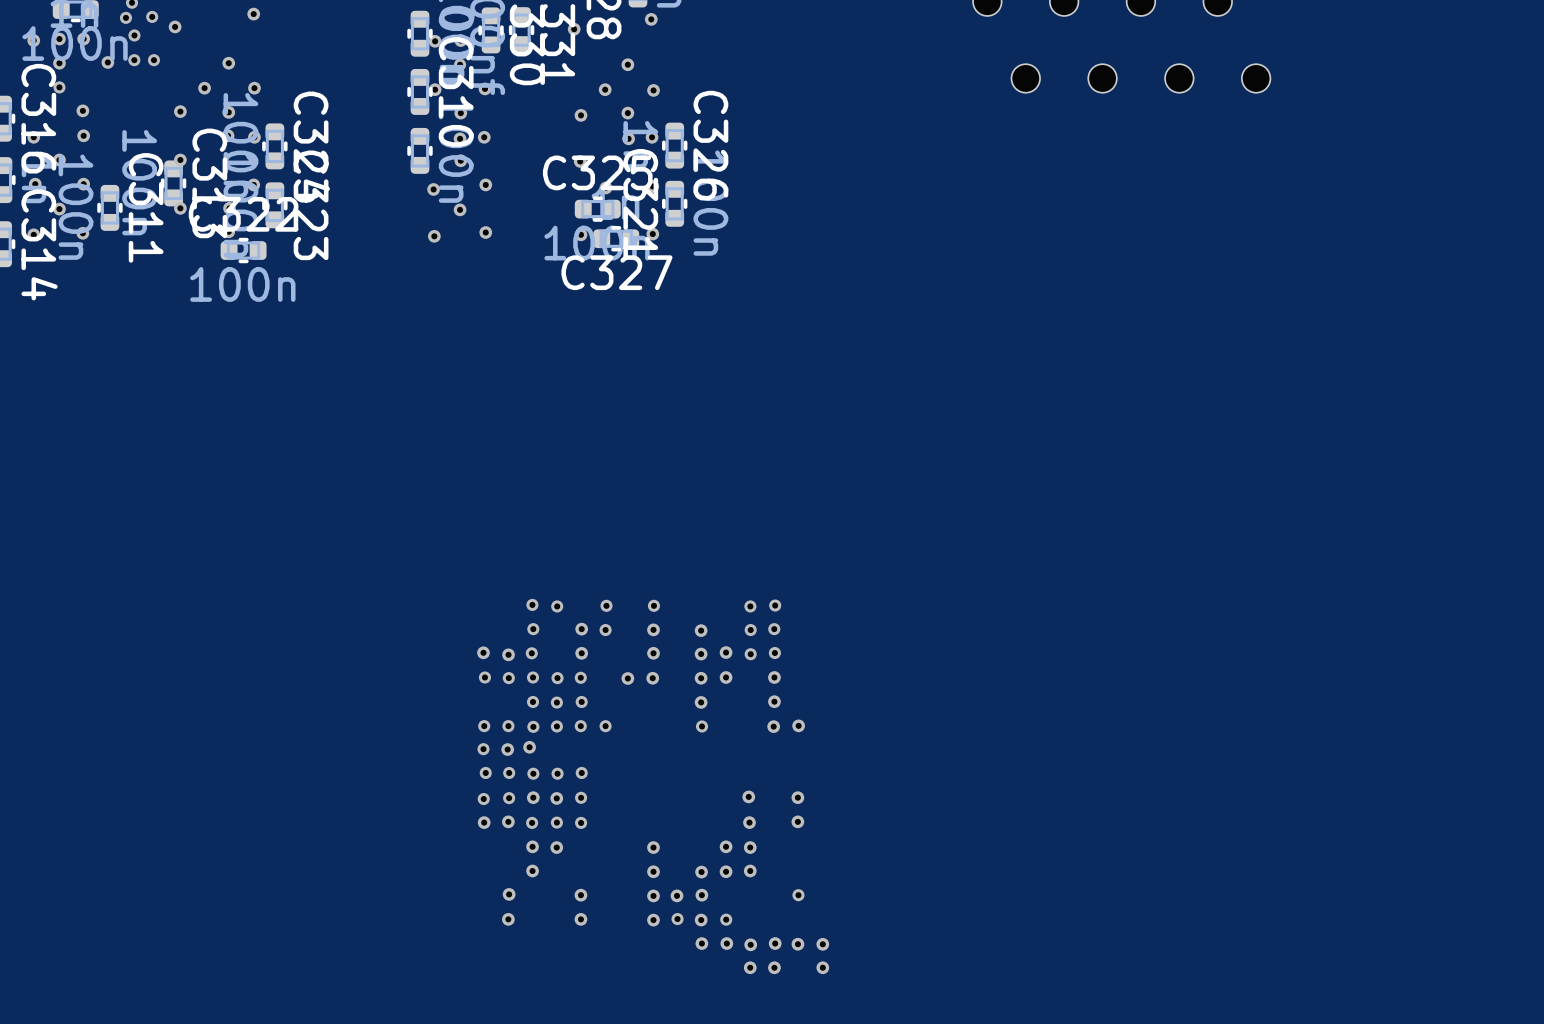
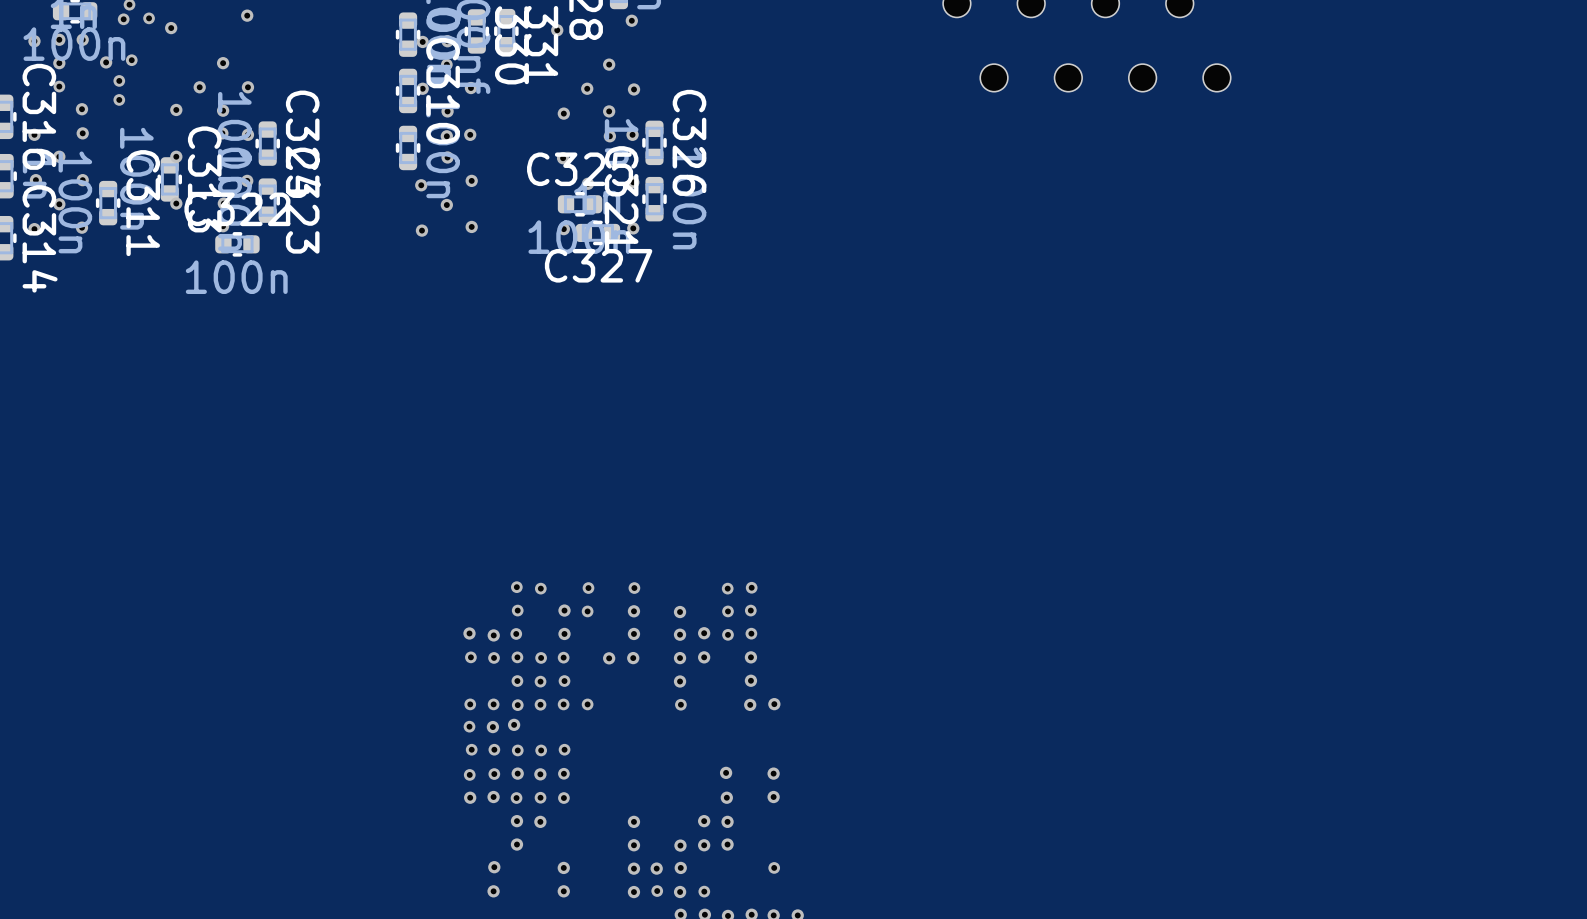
via: (134, 35) -> none
via: (153, 60) -> none
via: none -> (119, 80)
via: none -> (119, 99)

